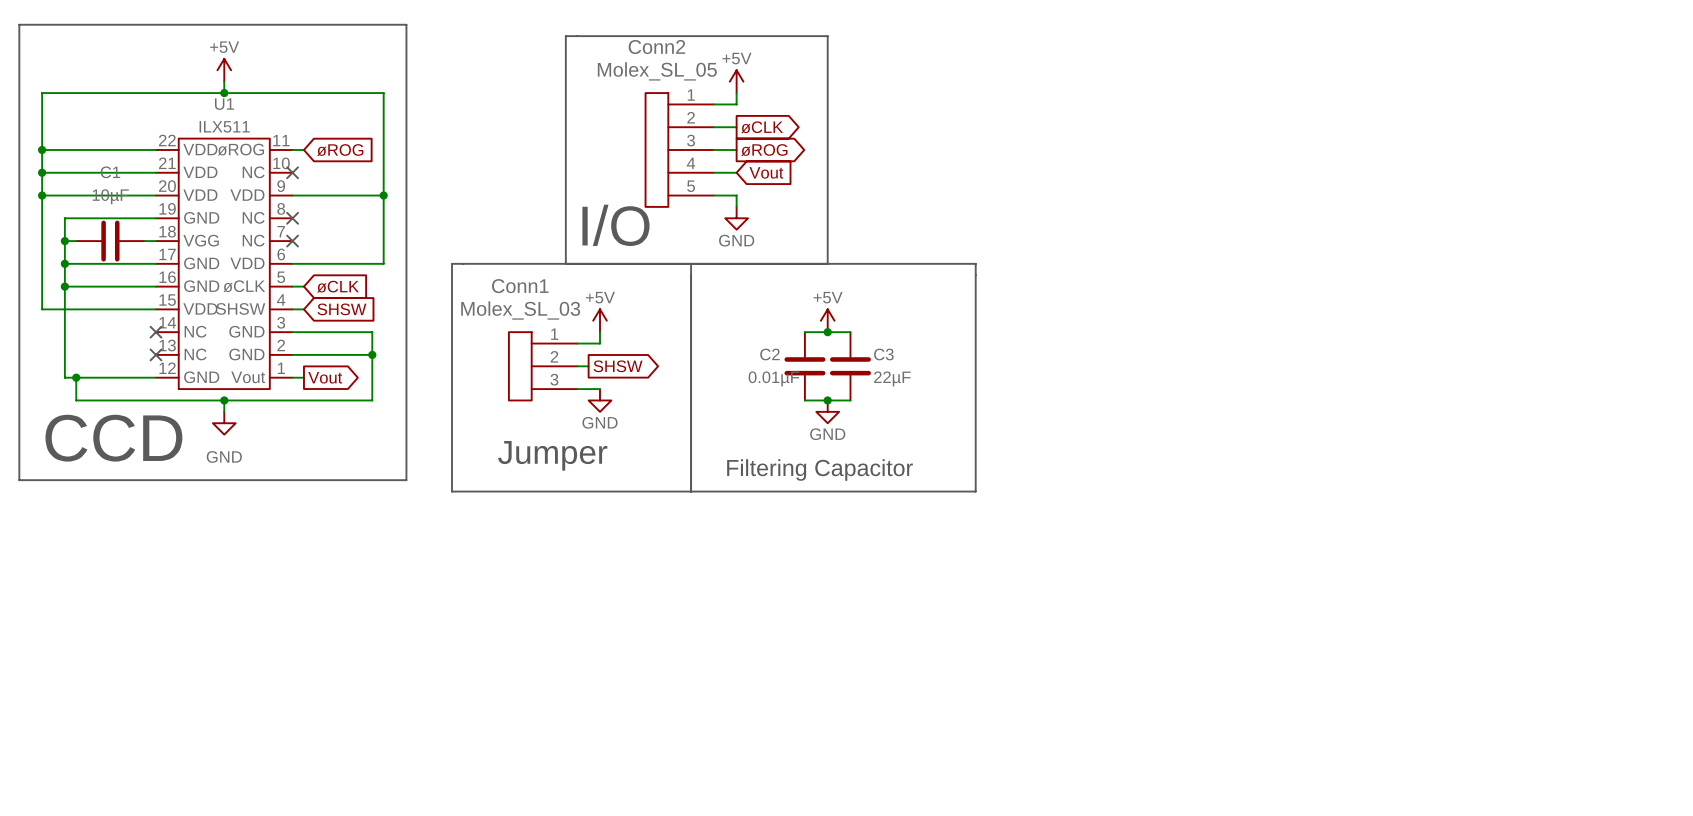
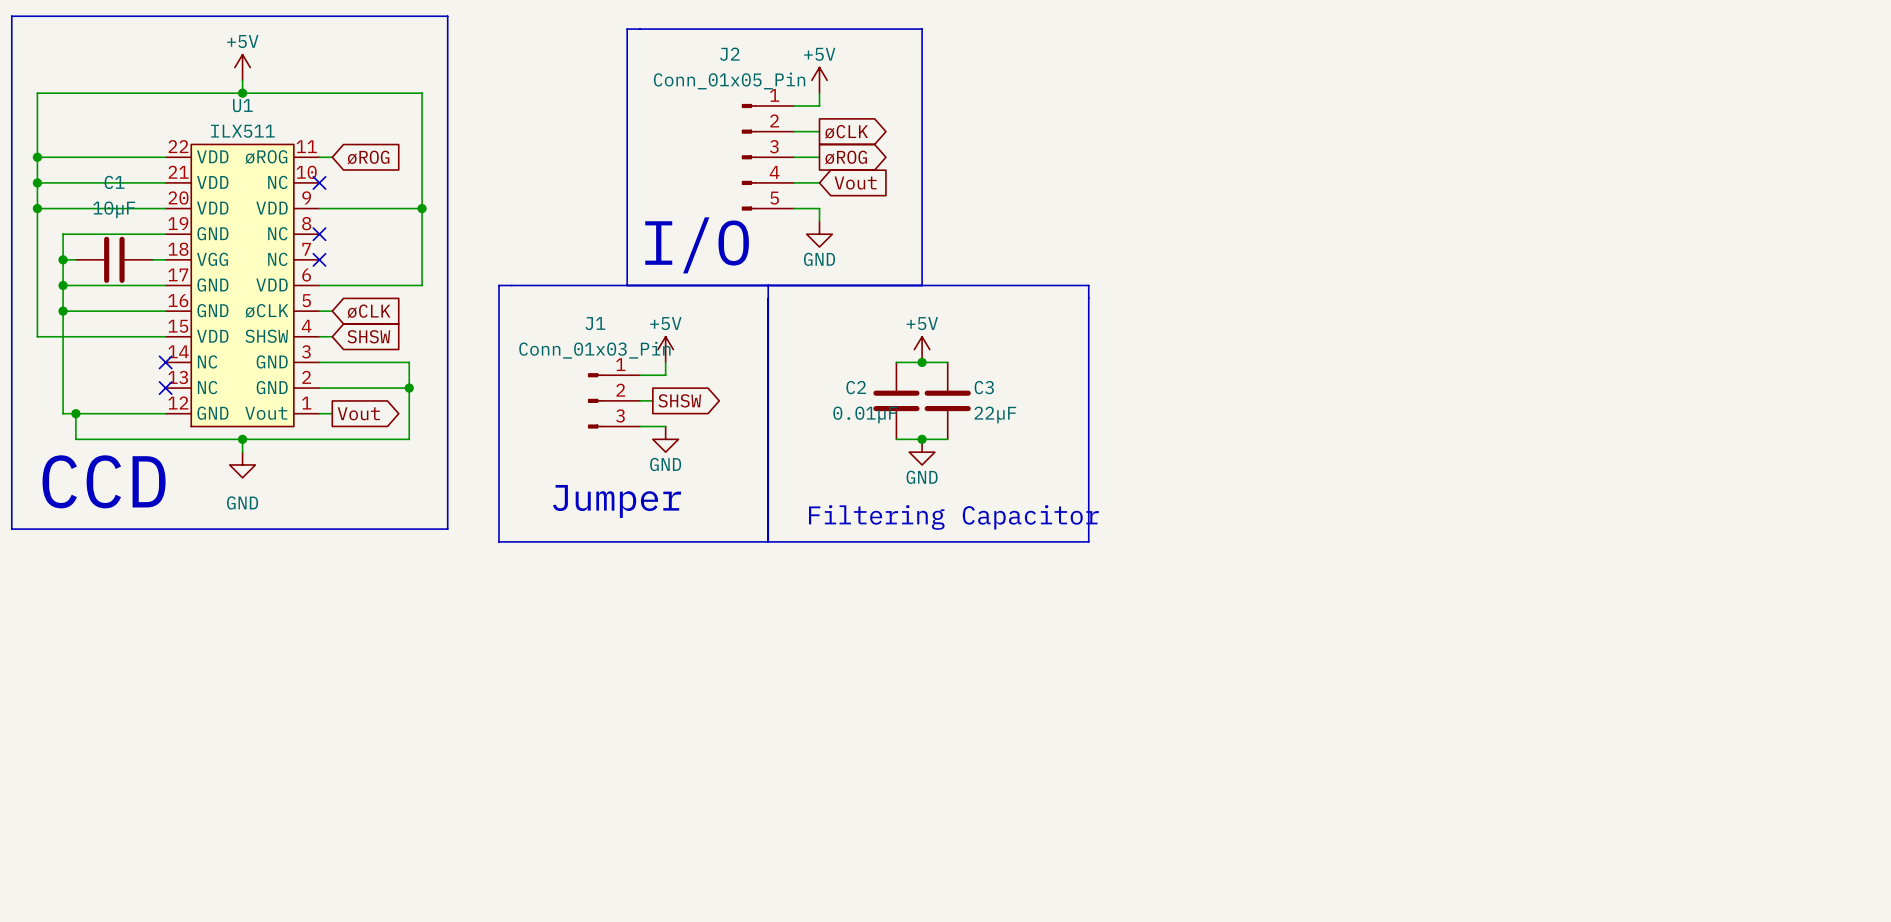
Conn2: Molex_SL_05 (679, 149) -> none
J2: none -> Conn_01x05_Pin (767, 157)
Conn1: Molex_SL_03 (543, 366) -> none
J1: none -> Conn_01x03_Pin (613, 400)

